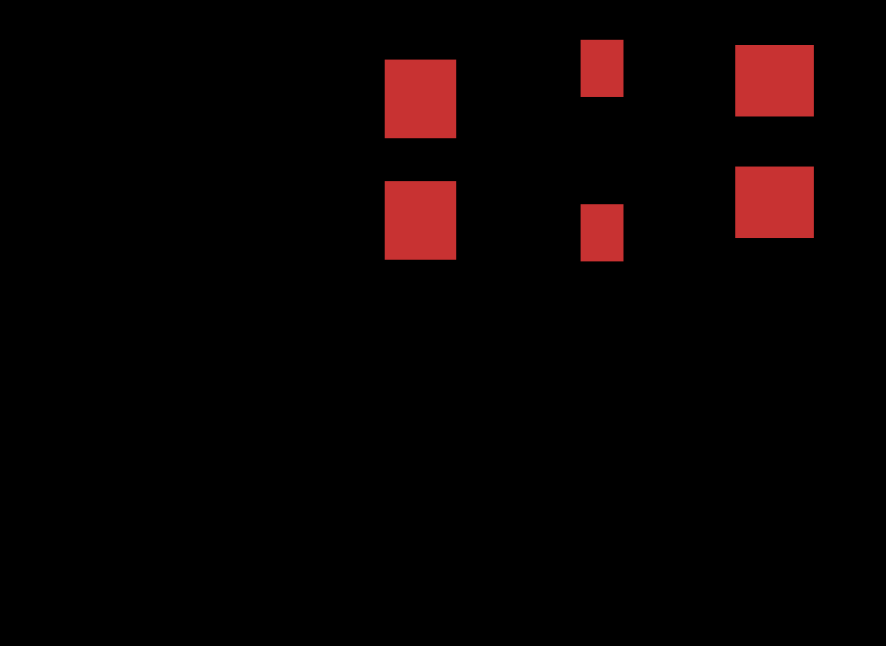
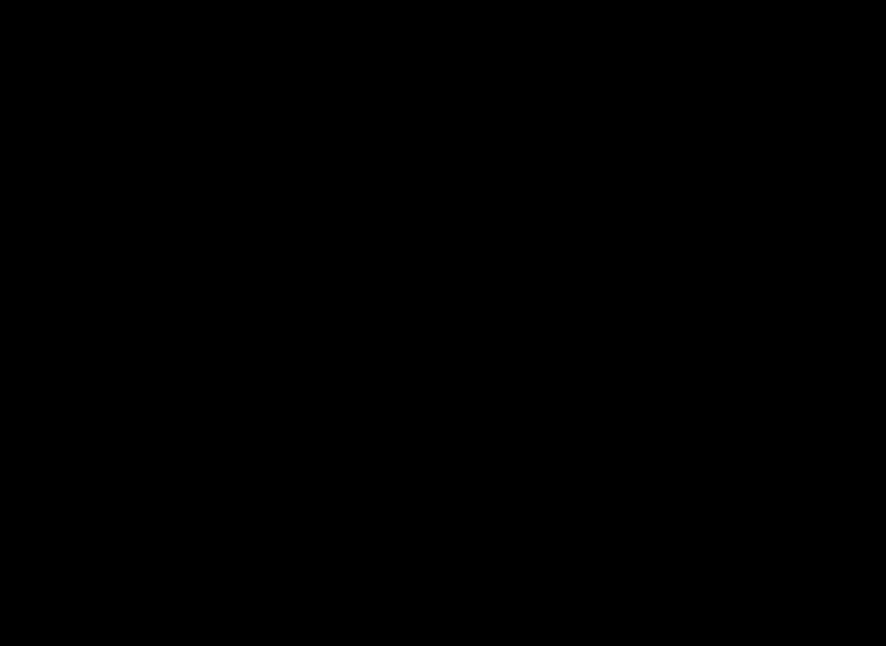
part: (774, 141) -> none
part: (602, 150) -> none
part: (420, 159) -> none

